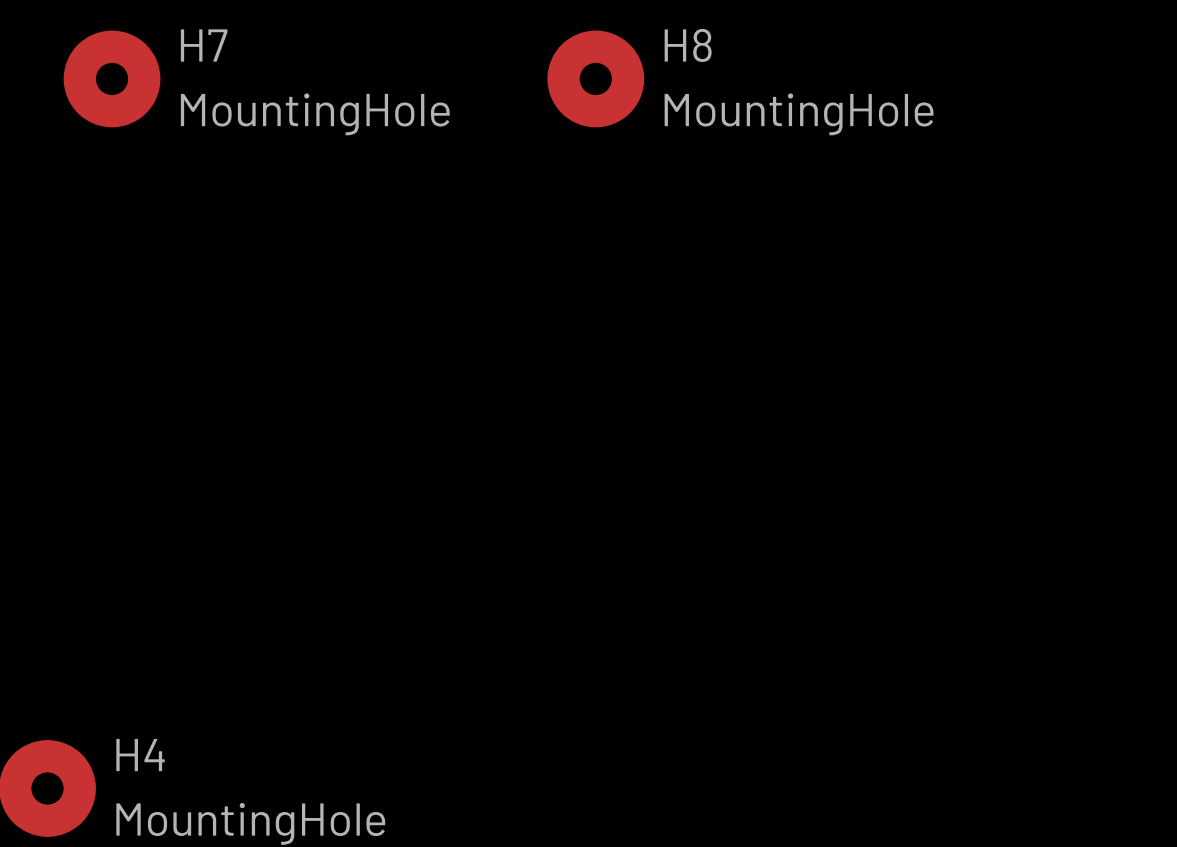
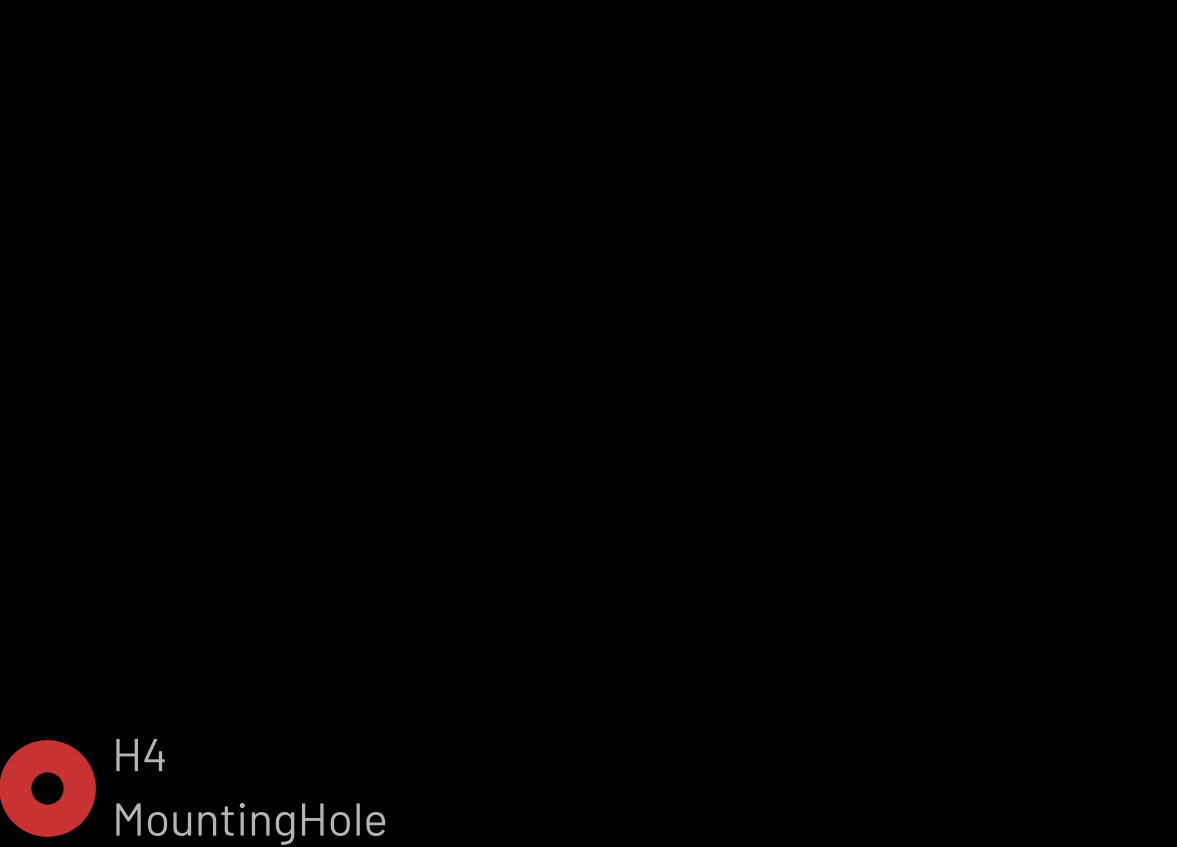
H7: MountingHole (112, 78) -> none
H8: MountingHole (595, 78) -> none

